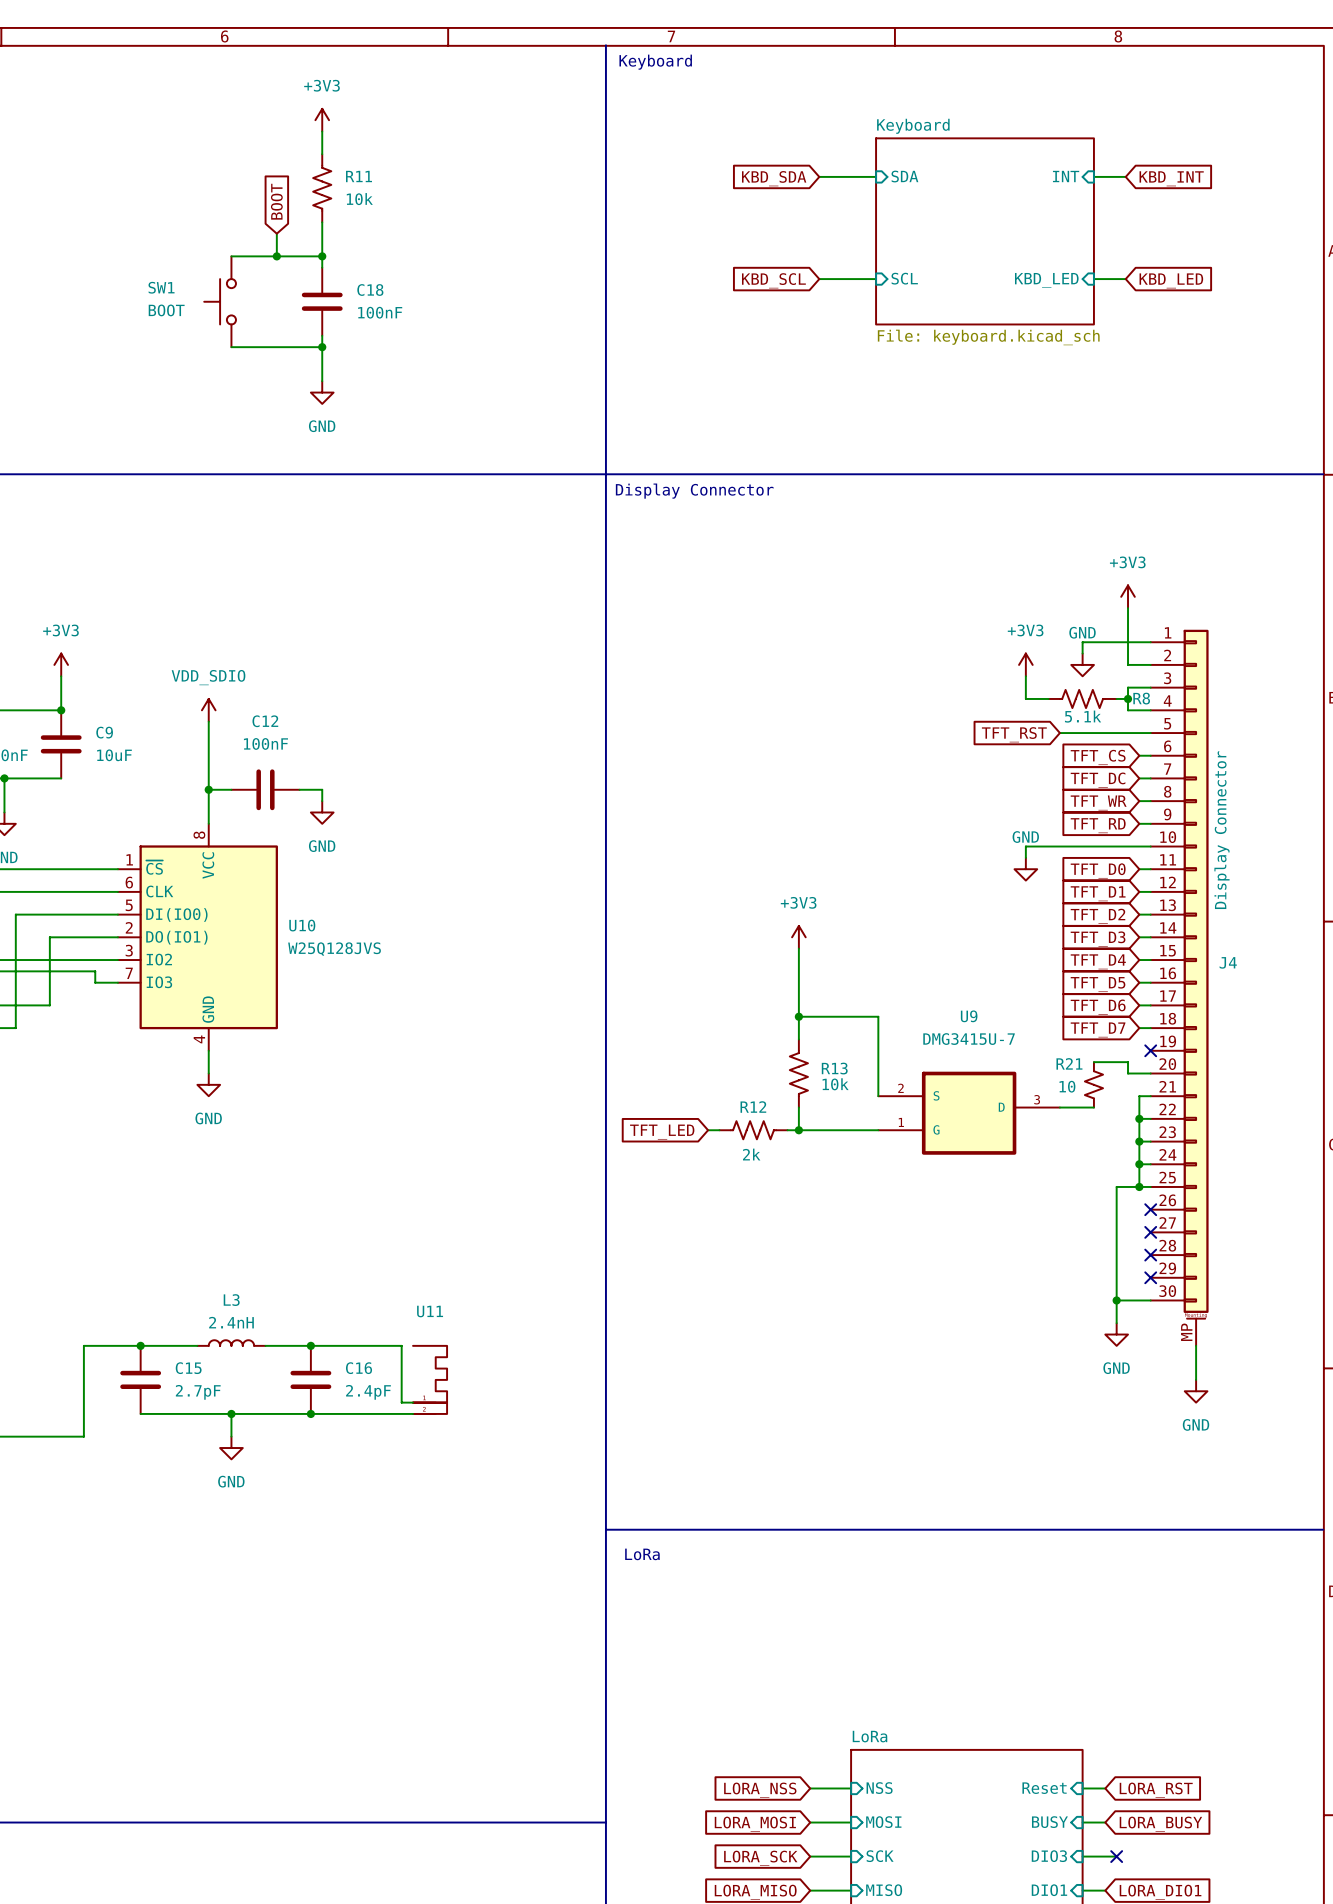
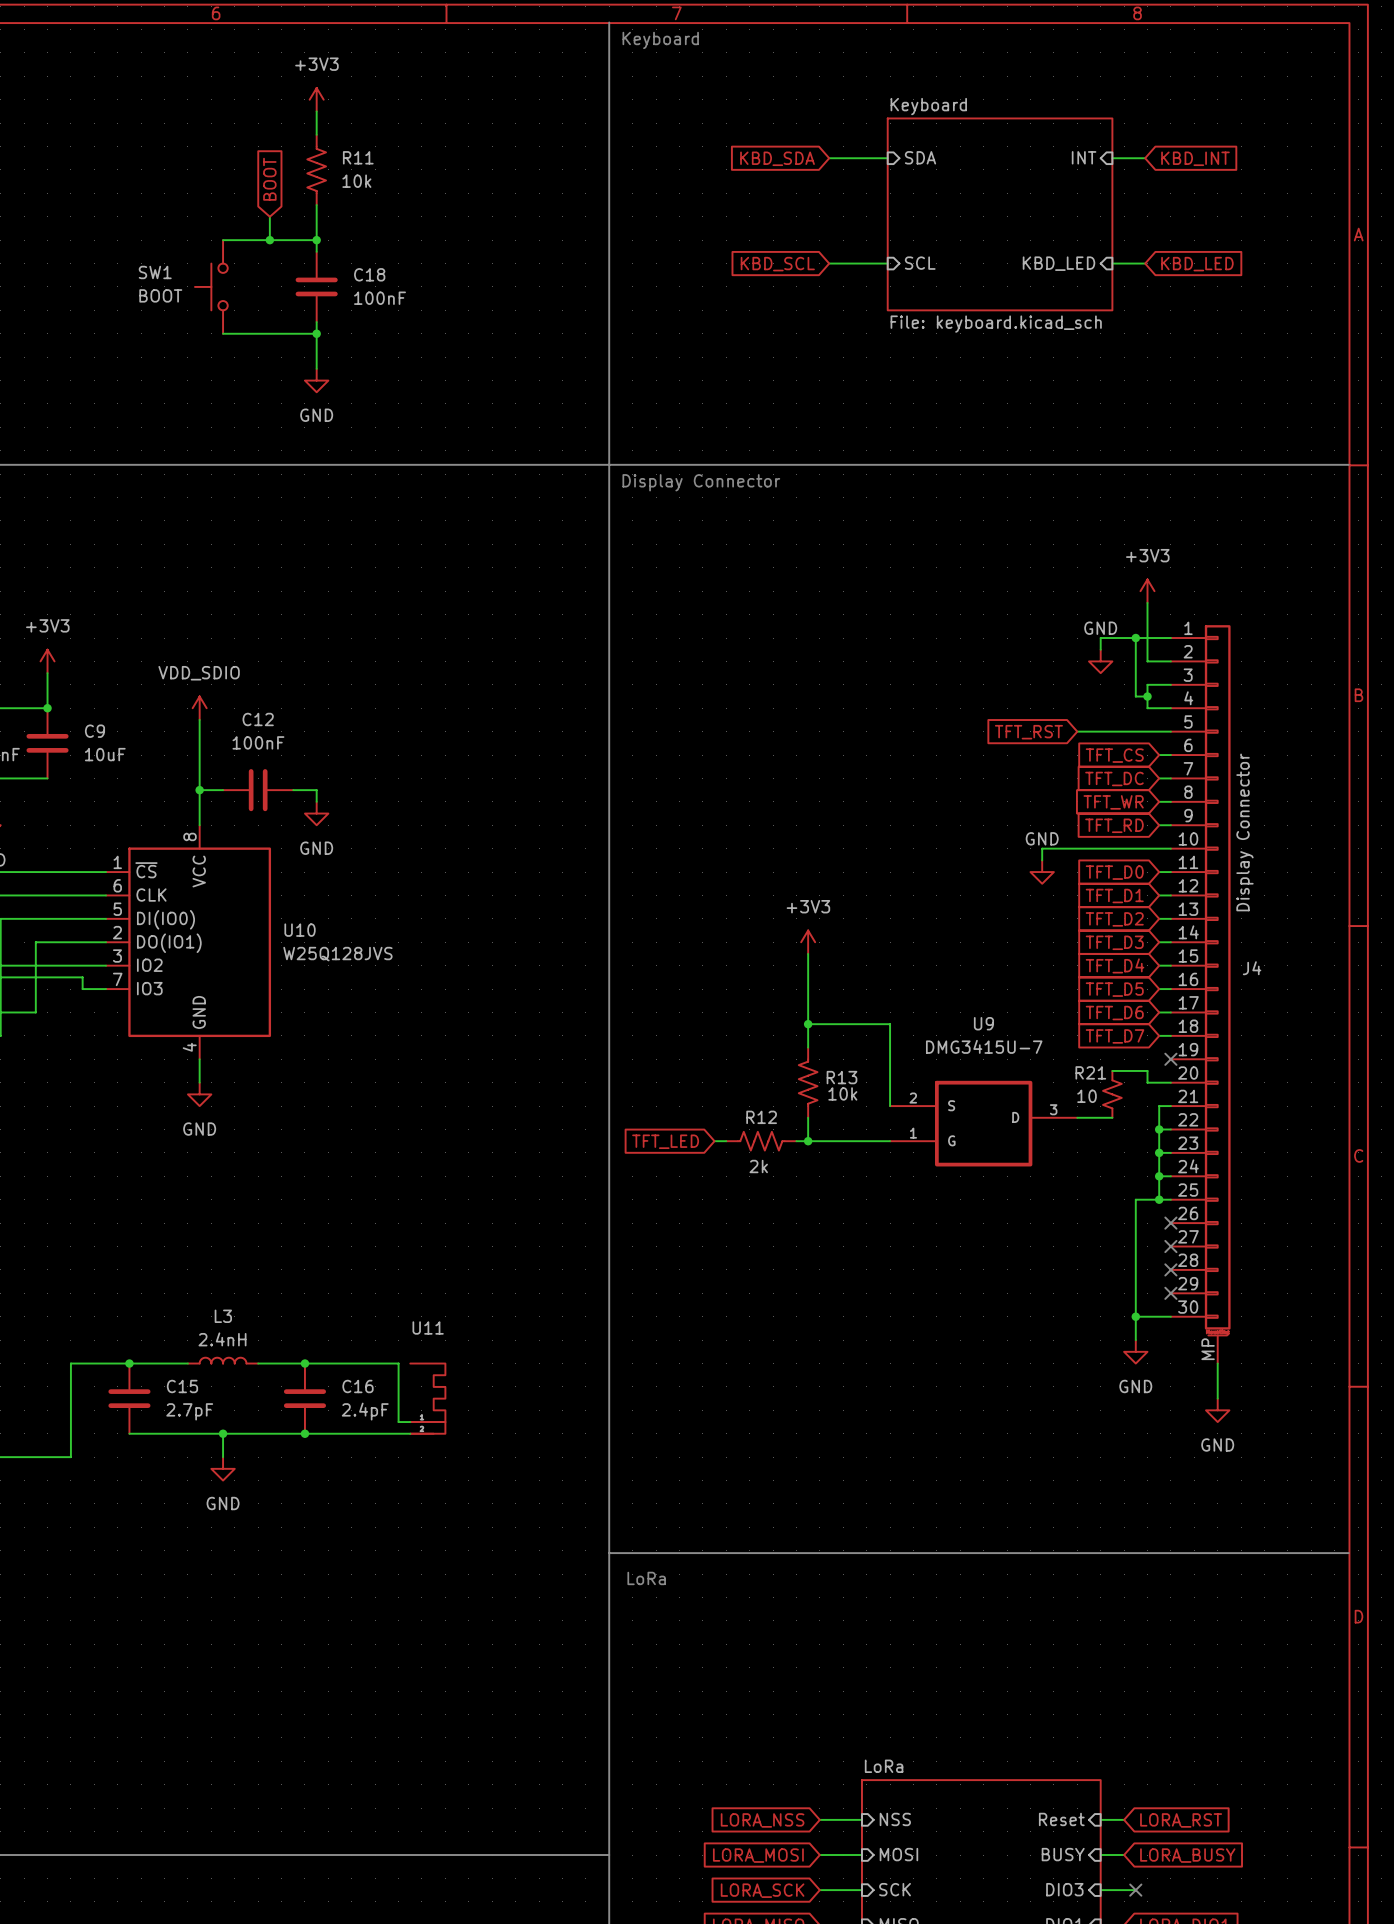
wire: none -> (1135, 638) (1135, 696)
junction: none -> (1135, 638)
power symbol: +3V3 (1025, 664) -> none
wire: (1025, 676) (1025, 698) (1048, 698) -> none
R8: 5.1k (1082, 698) -> none

